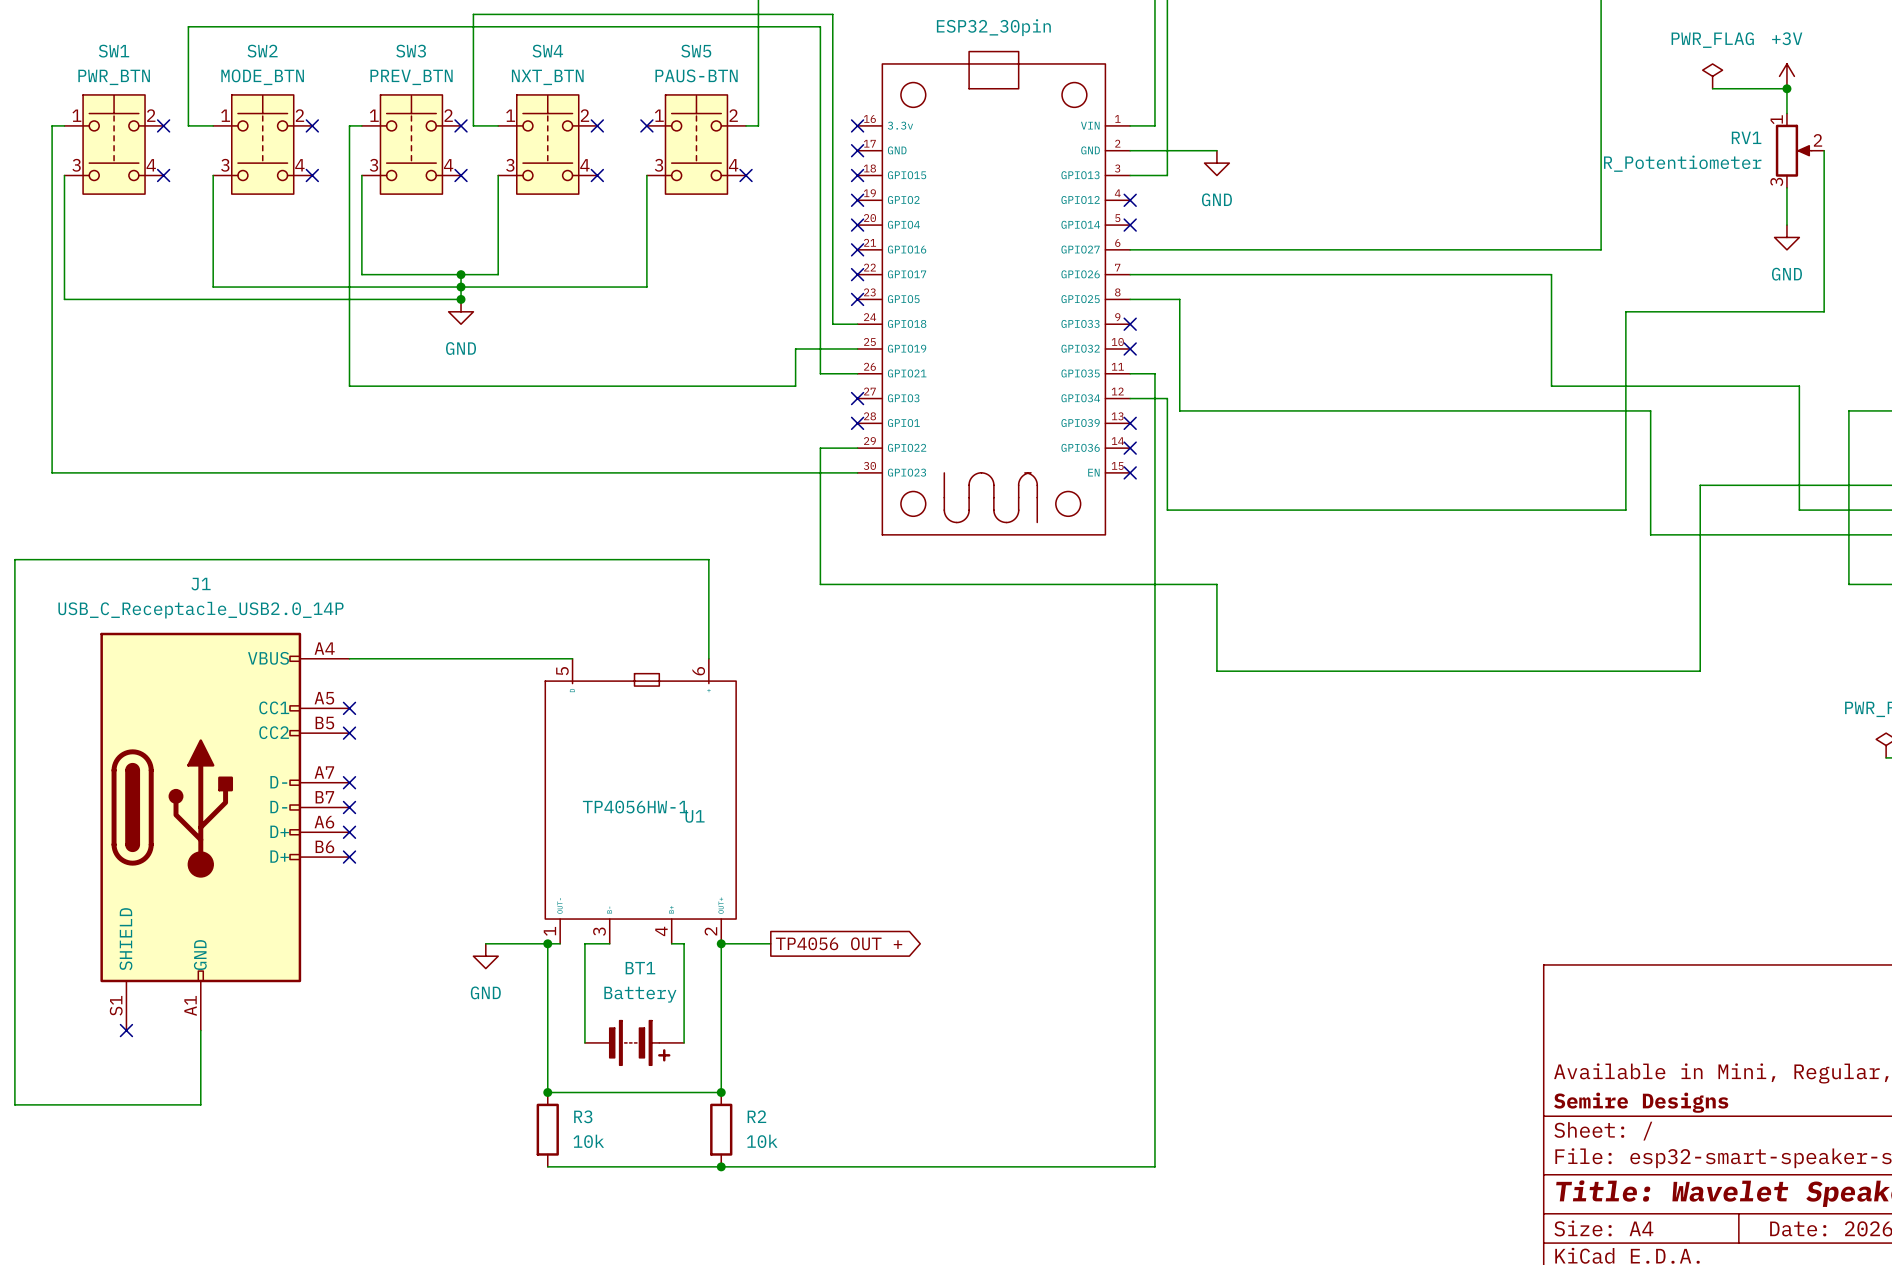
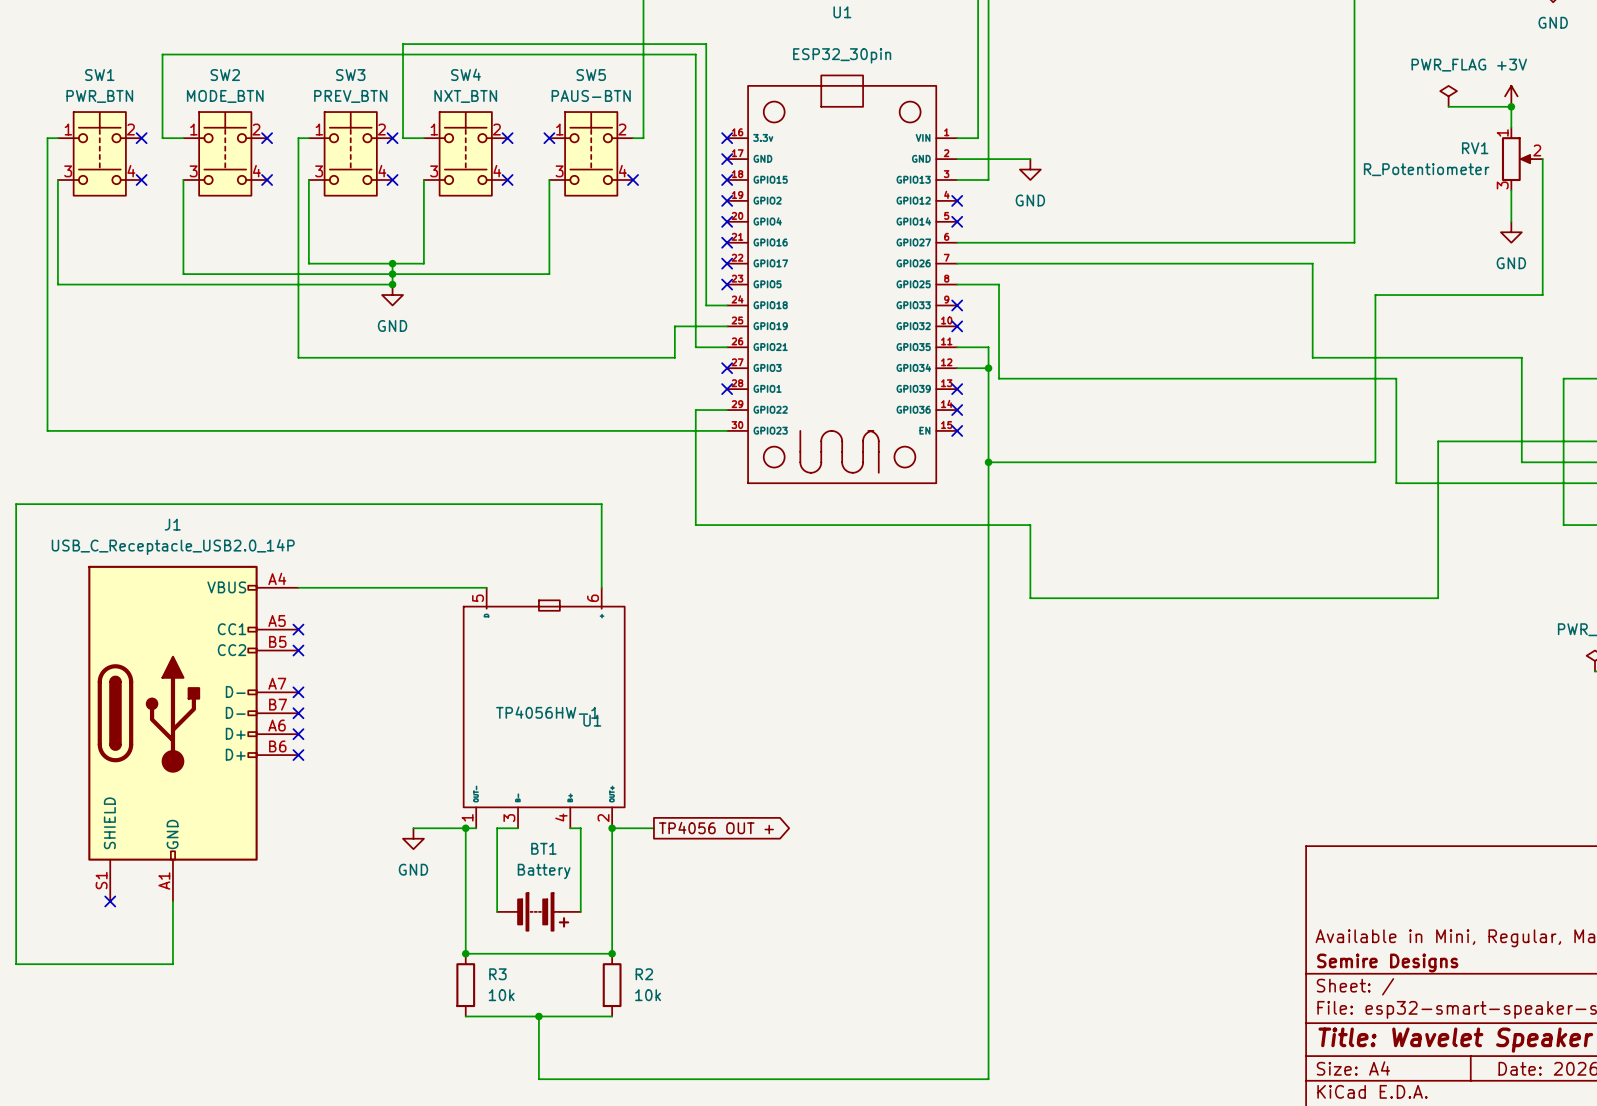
wire: (1154, 373) (1154, 1166) (721, 1166) -> (978, 347) (988, 347) (988, 368)
junction: none -> (988, 368)
wire: none -> (988, 462) (988, 1079) (538, 1079) (538, 1016)
junction: none -> (988, 462)
junction: none -> (538, 1016)
junction: (721, 1166) -> none

